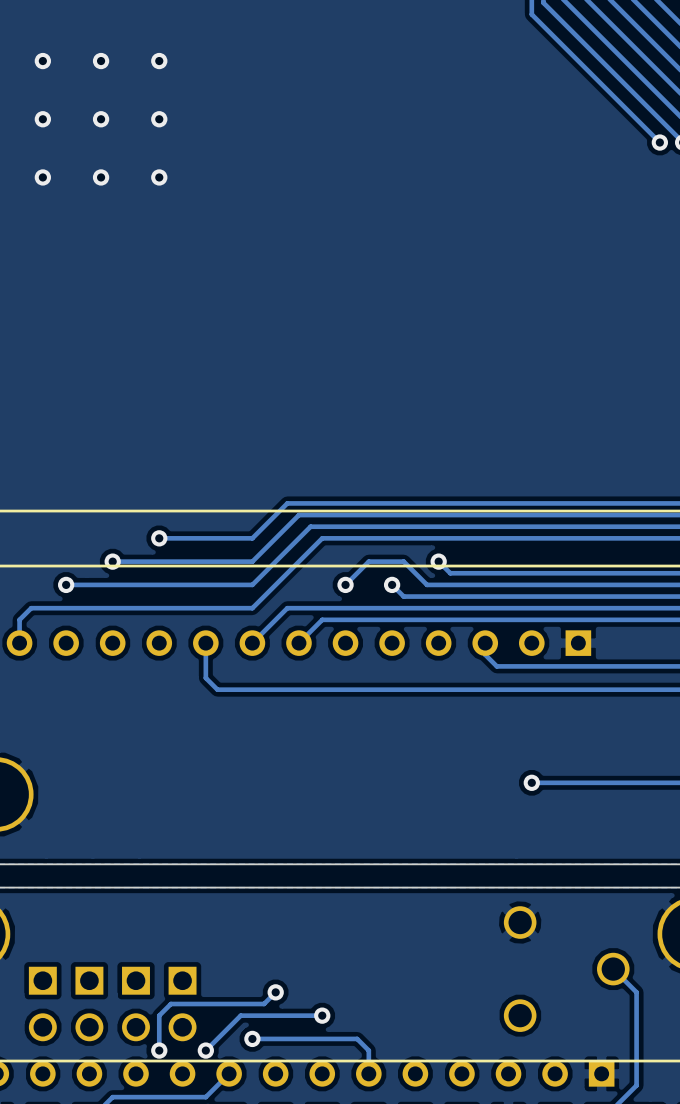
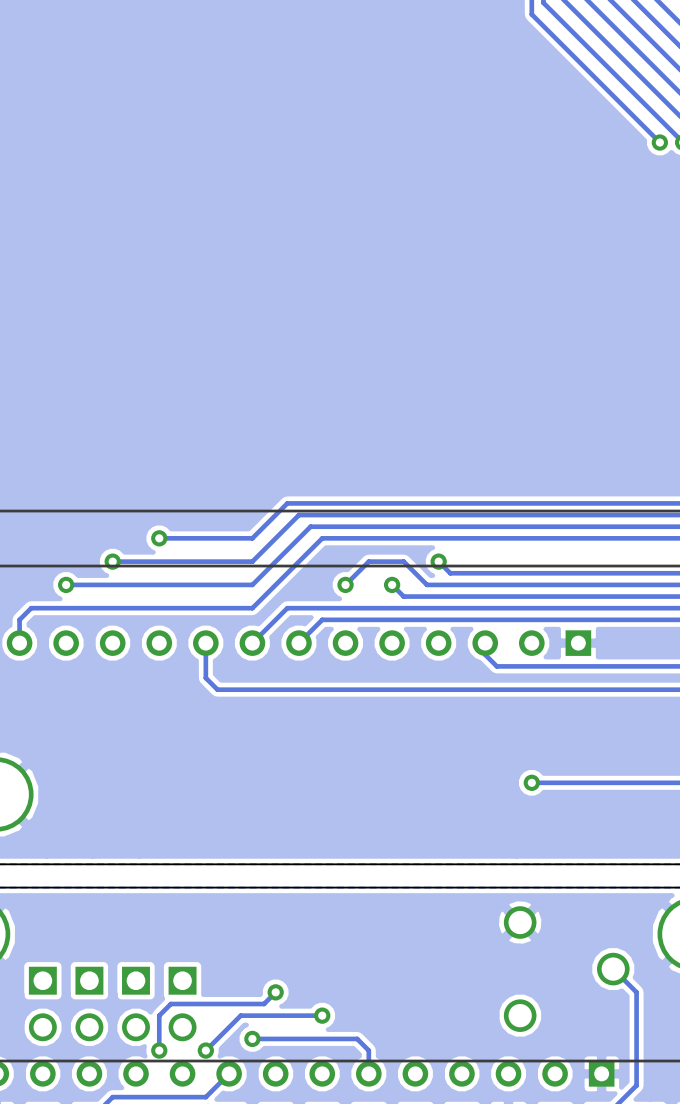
via: (42, 61) -> none
via: (101, 61) -> none
via: (159, 61) -> none
via: (42, 119) -> none
via: (101, 119) -> none
via: (159, 119) -> none
via: (42, 177) -> none
via: (101, 177) -> none
via: (159, 177) -> none

